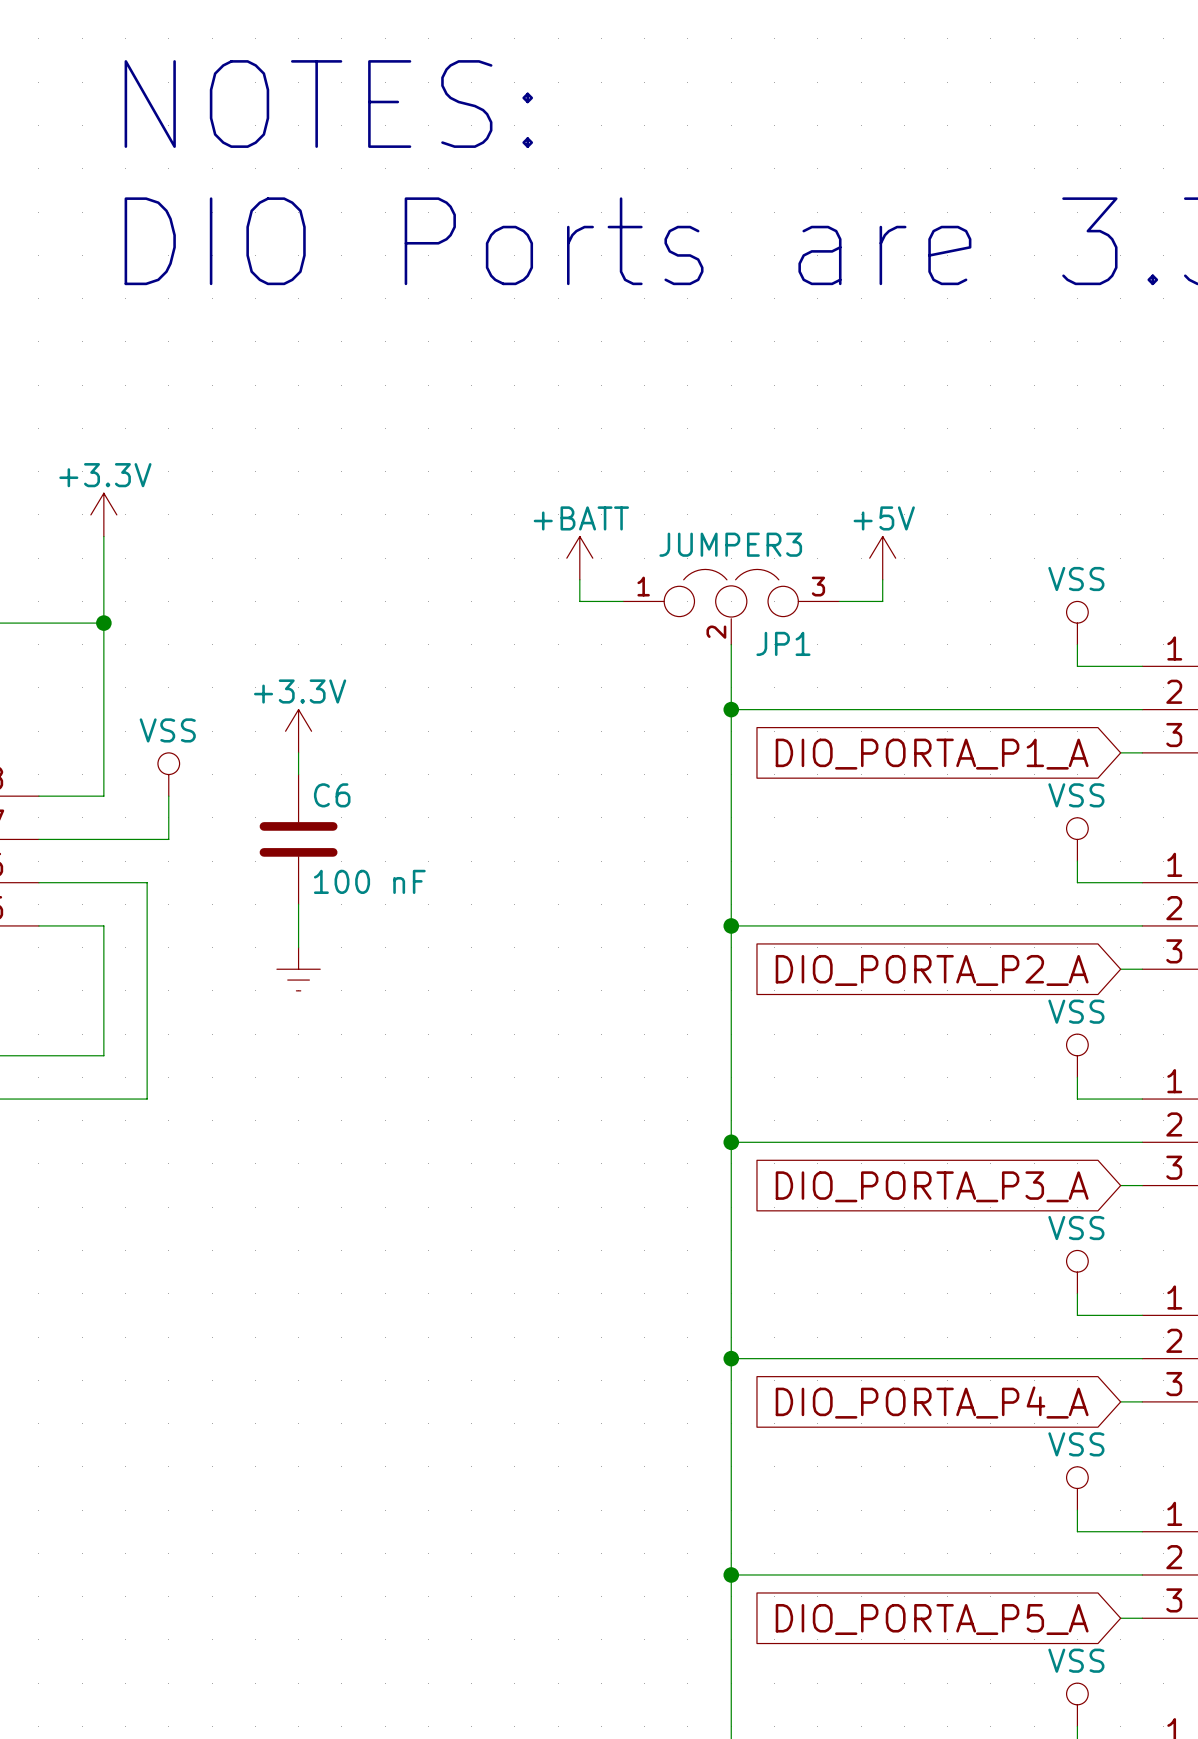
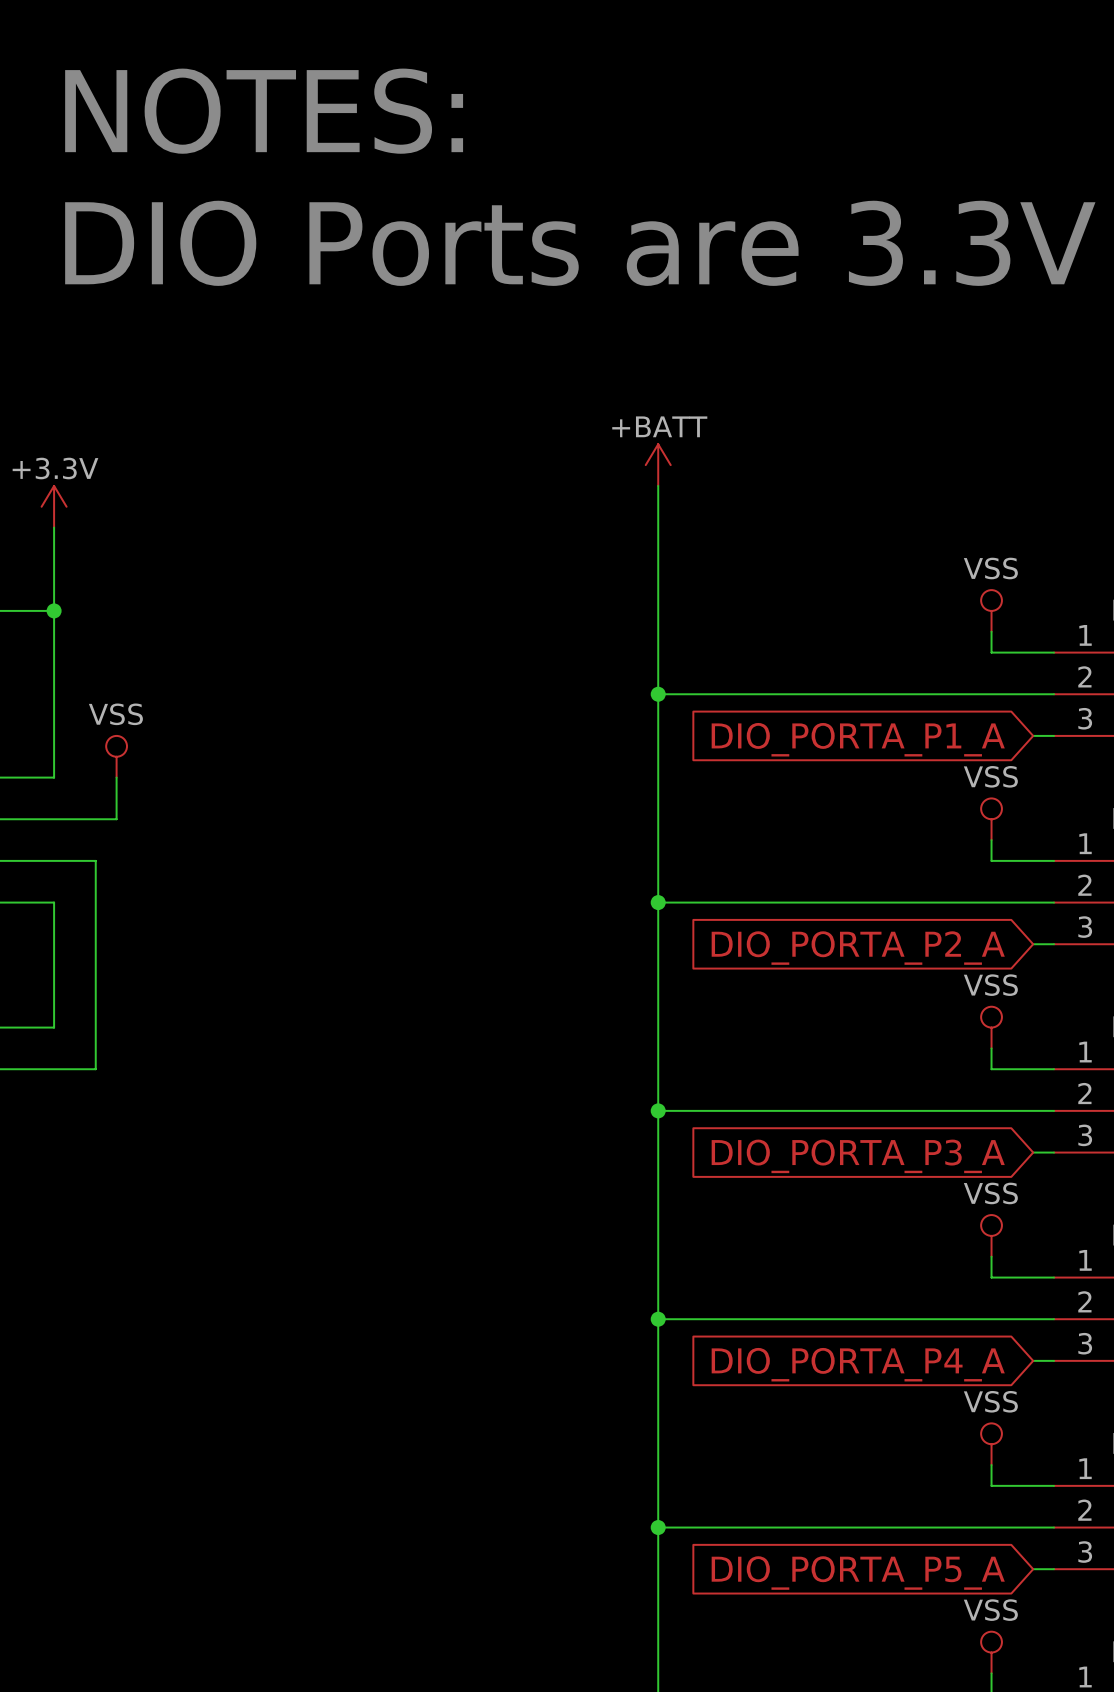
wire: none -> (658, 485) (658, 631)
power symbol position: +BATT (579, 558) -> +BATT (658, 465)
power symbol: +5V (882, 558) -> none
wire: (579, 579) (579, 601) (623, 601) -> none
wire: (882, 579) (882, 601) (839, 601) -> none
JP1: JUMPER3 (731, 607) -> none
power symbol: +3.3V (298, 731) -> none
wire: (298, 752) (298, 774) -> none
C6: 100 nF (298, 839) -> none
wire: (298, 904) (298, 947) -> none
power symbol: (298, 969) -> none

